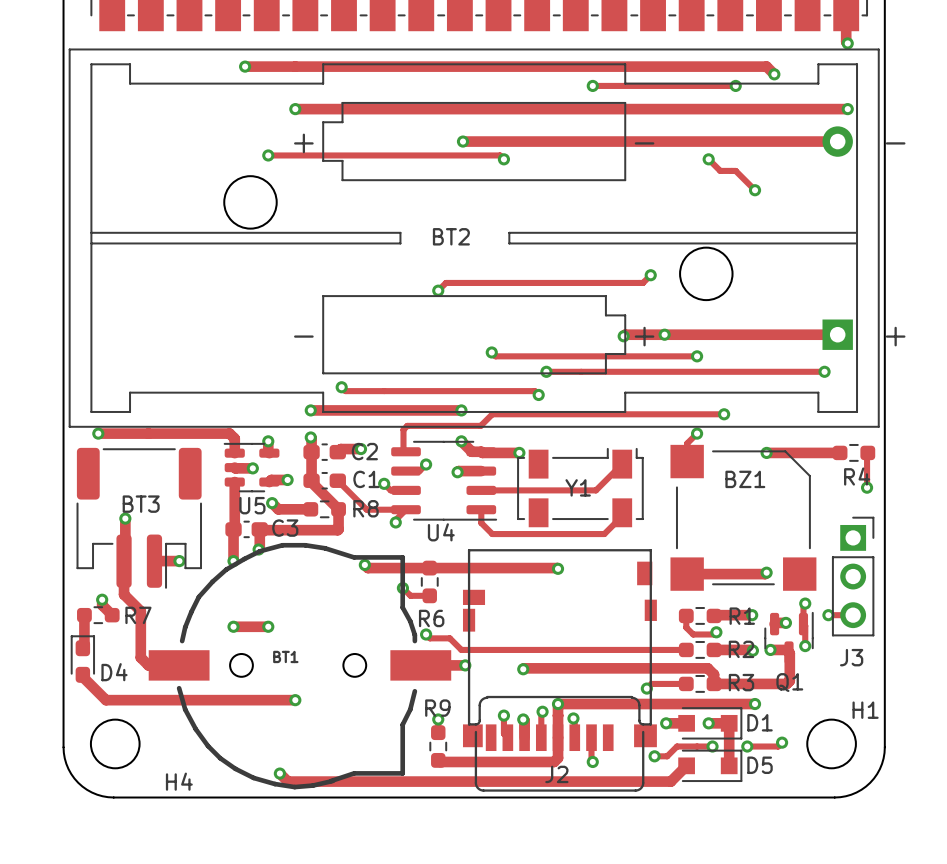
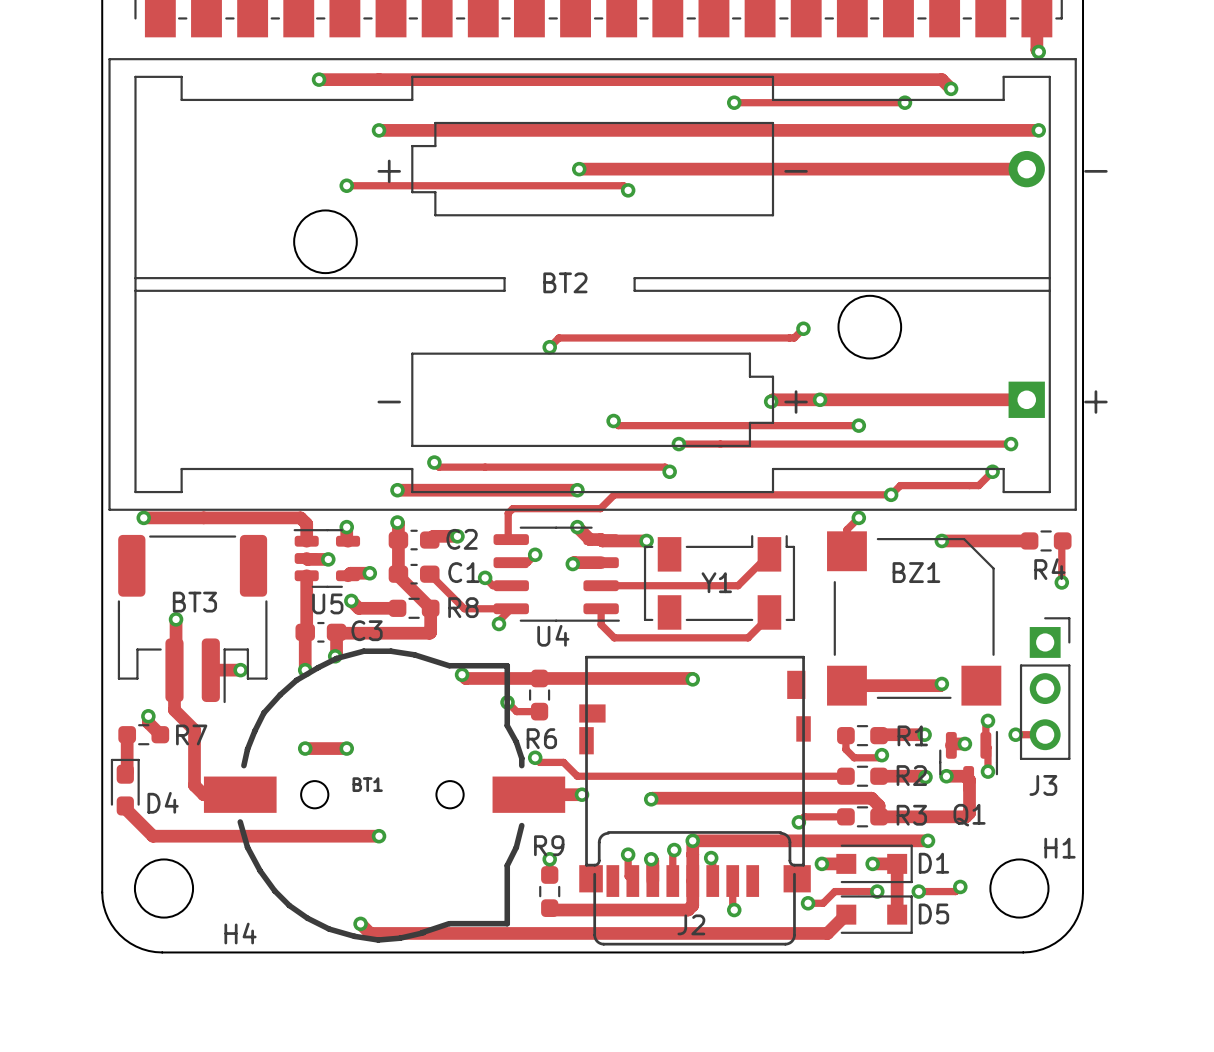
track: (708, 159) (720, 170) (735, 170) (755, 190) -> none
via: (708, 159) -> none
via: (755, 190) -> none
track: none -> (992, 471) (978, 485) (900, 485) (891, 494)
via: none -> (992, 471)

